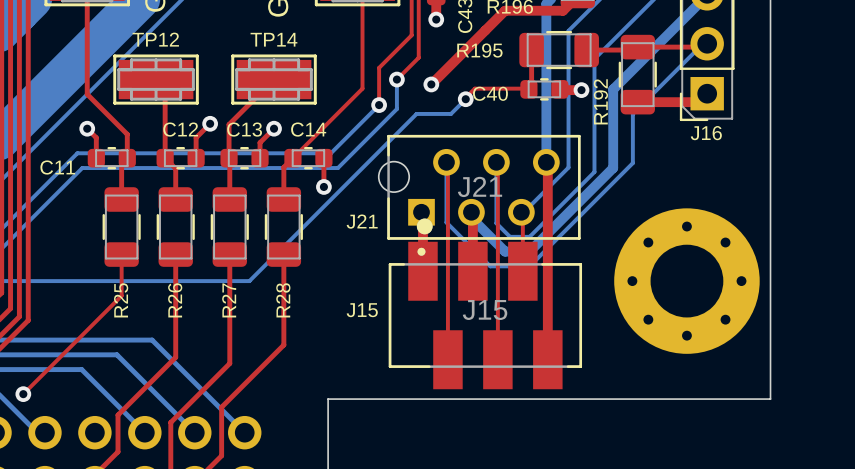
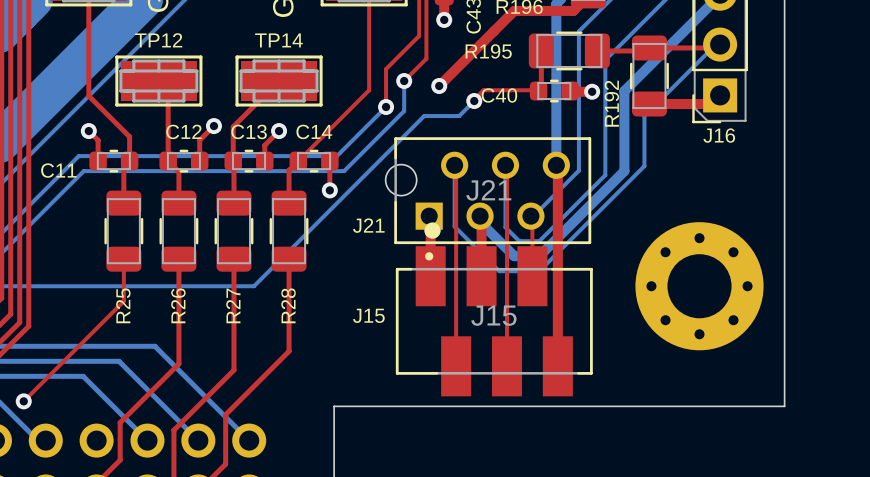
part footprint: [614, 208, 760, 354] -> [635, 222, 764, 351]

